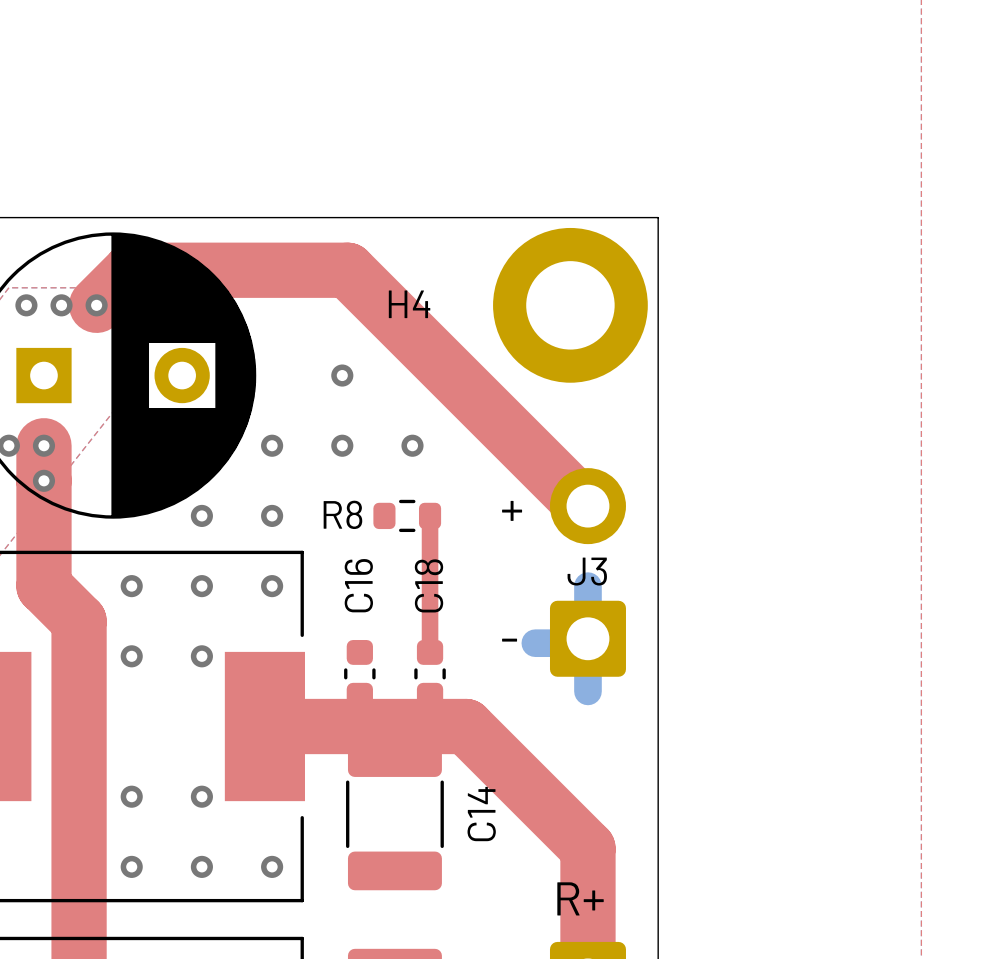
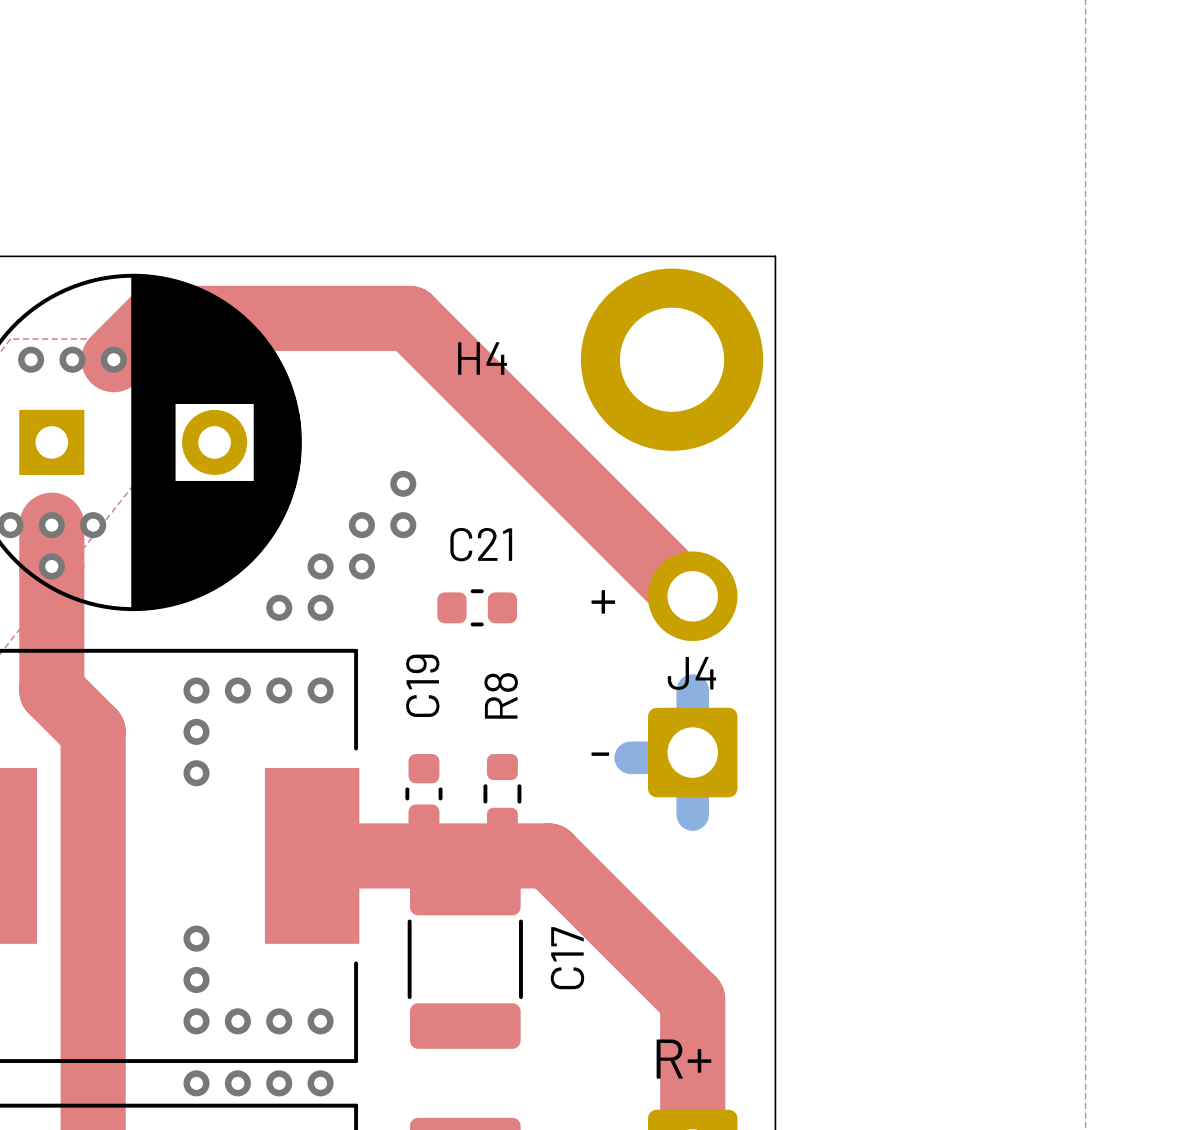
via position: (342, 375) -> (403, 483)
via: none -> (93, 525)
via: (272, 445) -> none
via: none -> (361, 525)
via: (412, 445) -> none
via: none -> (320, 566)
via: none -> (361, 566)
via position: (201, 515) -> (279, 607)
C21: none -> (477, 607)
R8 rotation: 0° (407, 515) -> 90° clockwise (502, 793)
R8 position: (407, 515) -> (502, 793)
top track: (430, 515) (430, 652) -> none
J3 name: J3 (587, 571) -> J4 (691, 673)
C16 name: C16 (358, 585) -> C19 (422, 685)
via: (131, 586) -> none
via: none -> (196, 690)
via: none -> (279, 690)
via: none -> (196, 731)
via: (131, 656) -> none
via: none -> (196, 773)
via: (201, 656) -> none
C18: (430, 673) -> none
via: (131, 796) -> none
via: none -> (196, 938)
via: (201, 796) -> none
C14 name: C14 (481, 814) -> C17 (567, 958)
via: none -> (196, 979)
via: (131, 866) -> none
via: none -> (196, 1021)
via: none -> (279, 1021)
via: none -> (196, 1083)
via: none -> (237, 1083)
via: none -> (279, 1083)
via: none -> (320, 1083)

